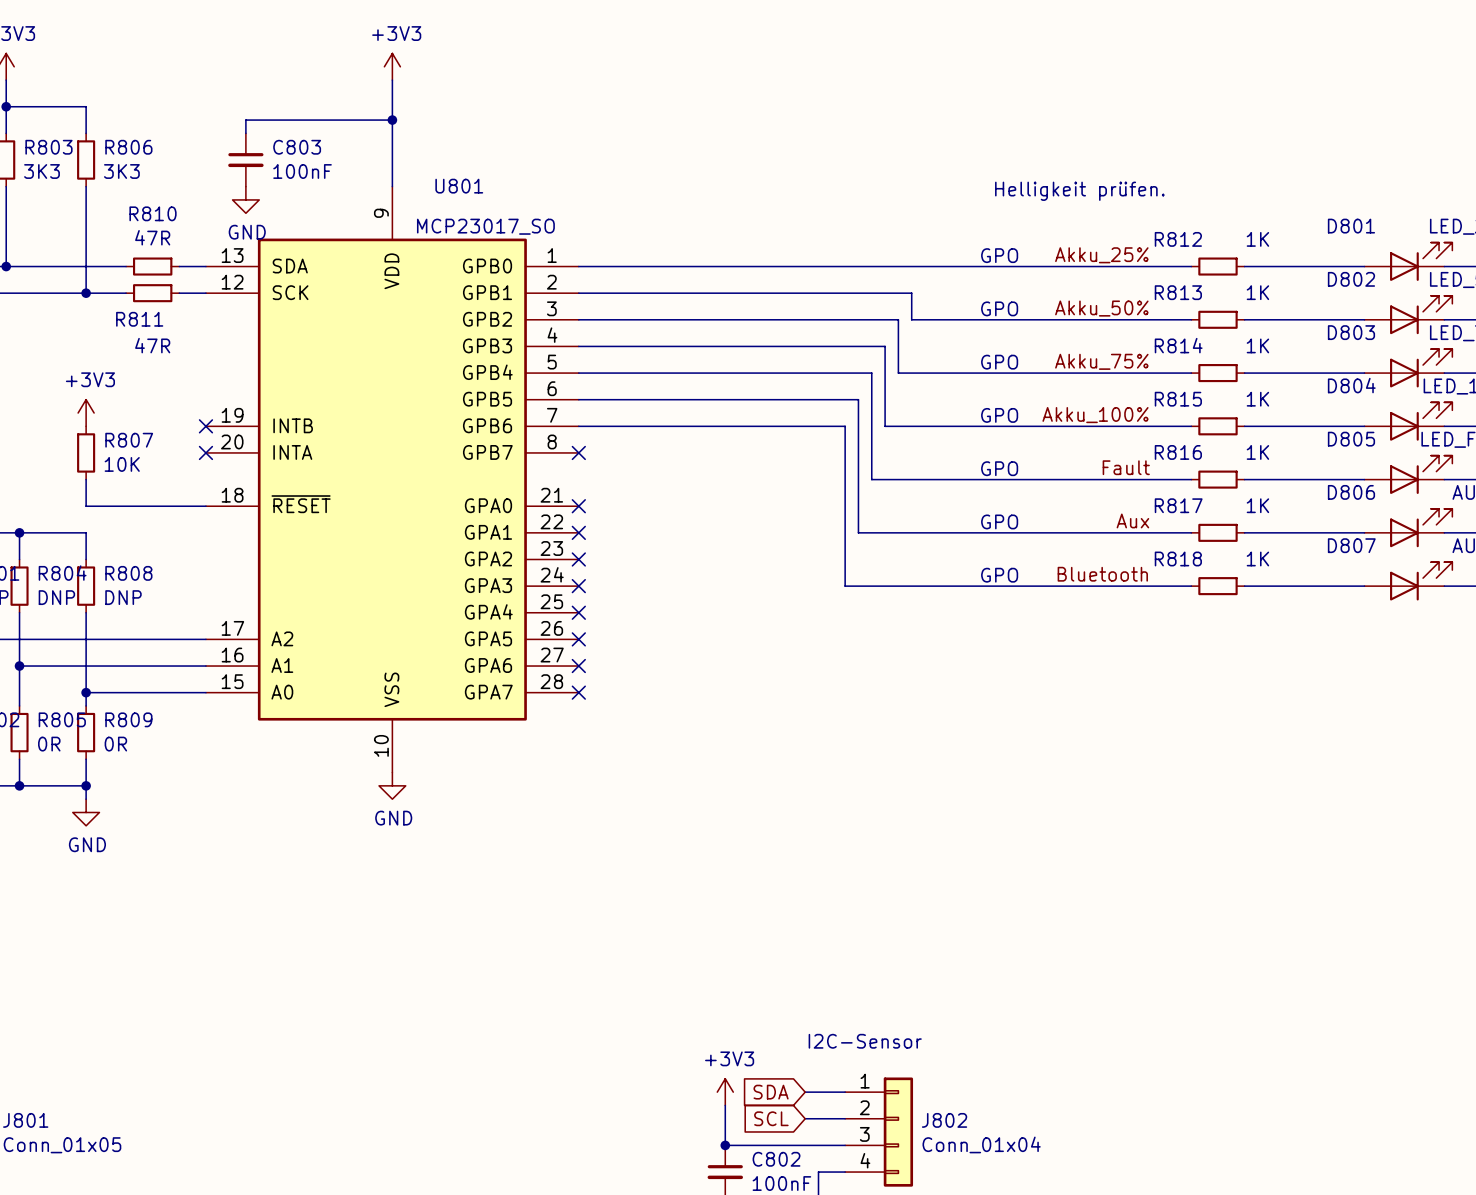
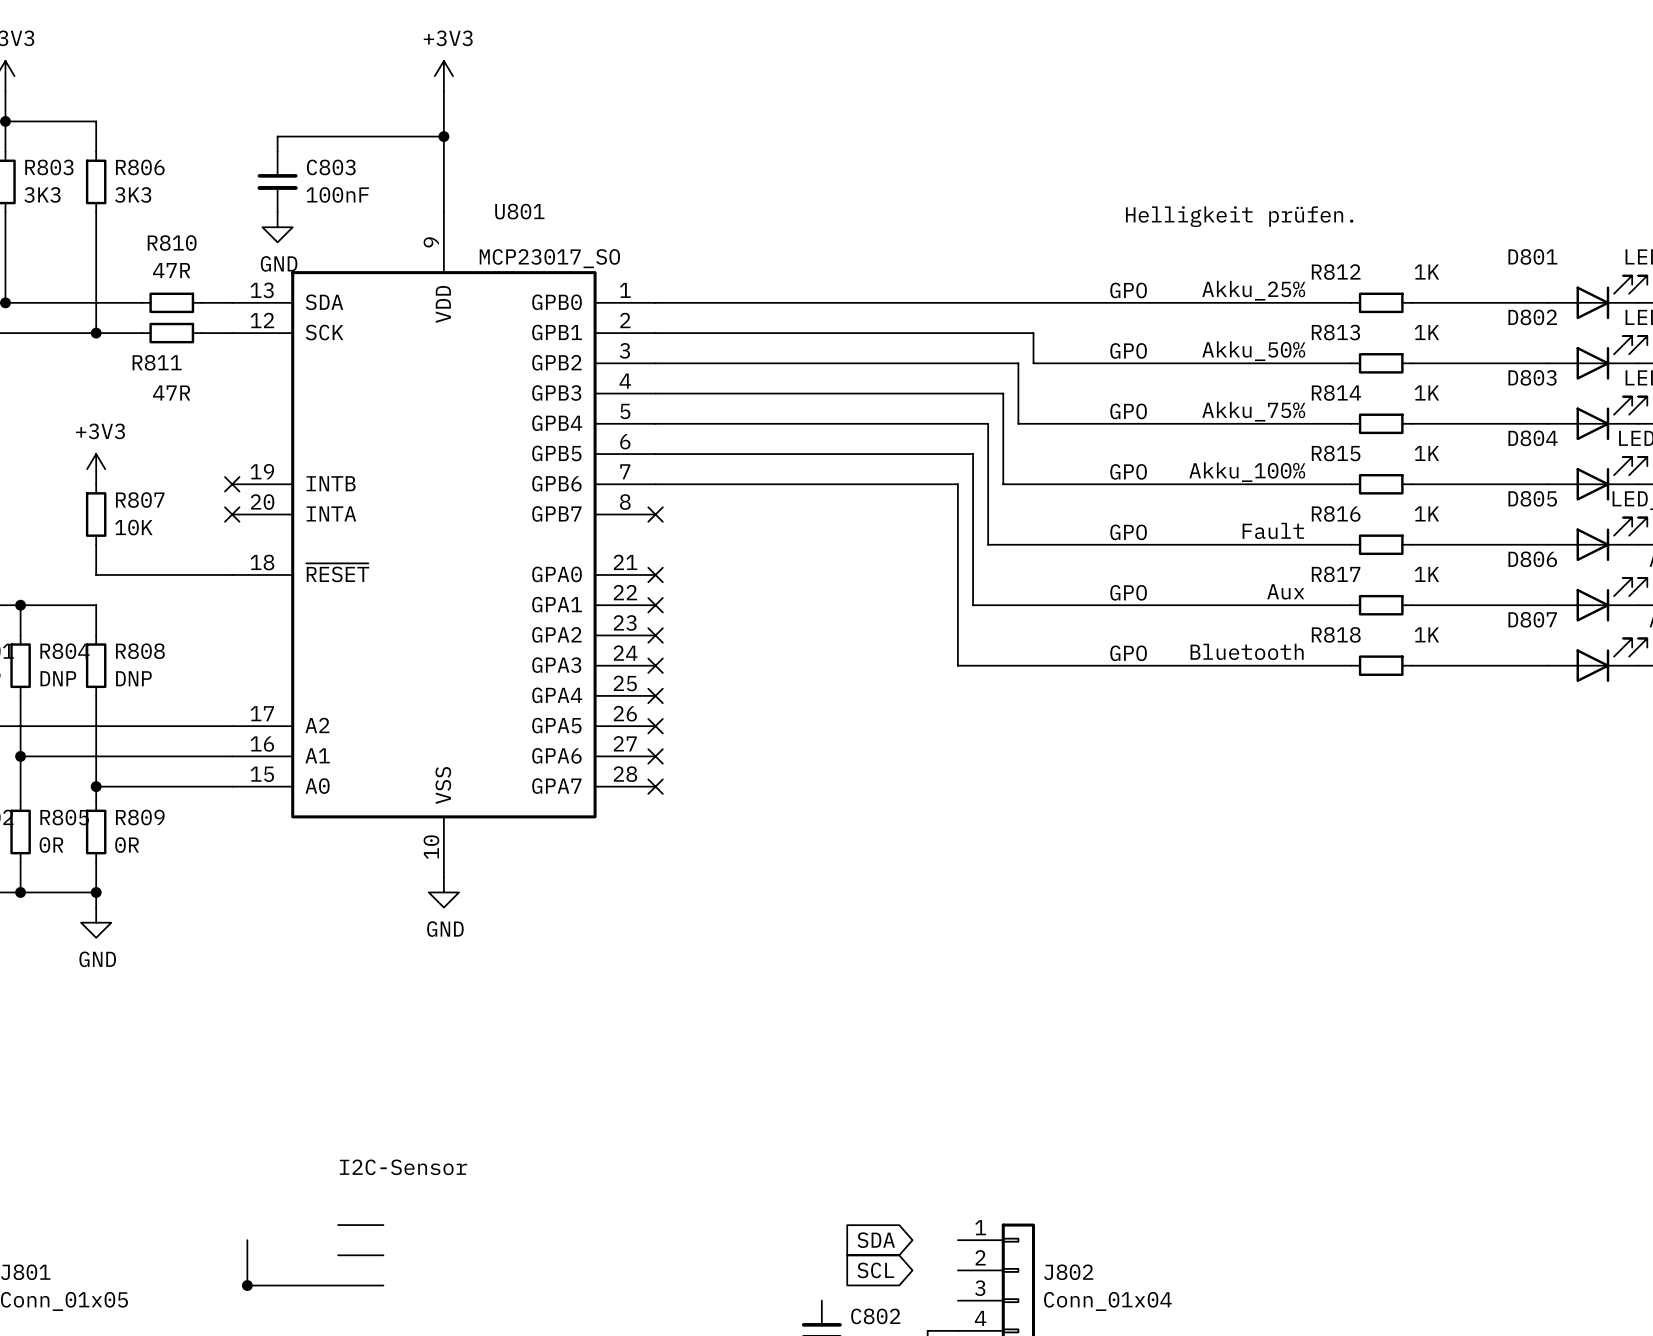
text: none -> I2C-Sensor (403, 1167)
text: I2C-Sensor (865, 1041) -> none
wire: none -> (338, 1225) (383, 1225)
wire: none -> (247, 1240) (247, 1285) (383, 1285)
power symbol: +3V3 (725, 1092) -> none
wire: (805, 1092) (845, 1092) -> none
wire: none -> (338, 1255) (383, 1255)
wire: (725, 1105) (725, 1145) (845, 1145) -> none
wire: (805, 1118) (845, 1118) -> none
junction: none -> (247, 1285)
junction: (725, 1145) -> none

